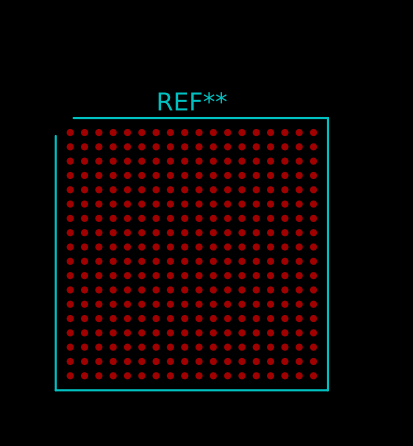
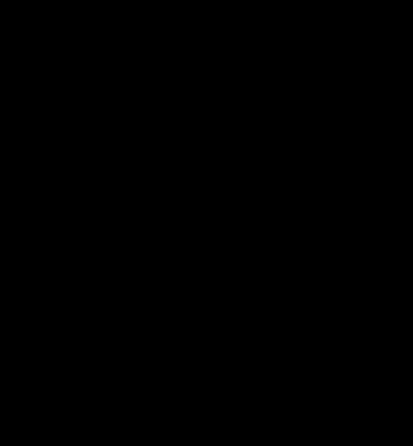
REF**: (191, 254) -> none

